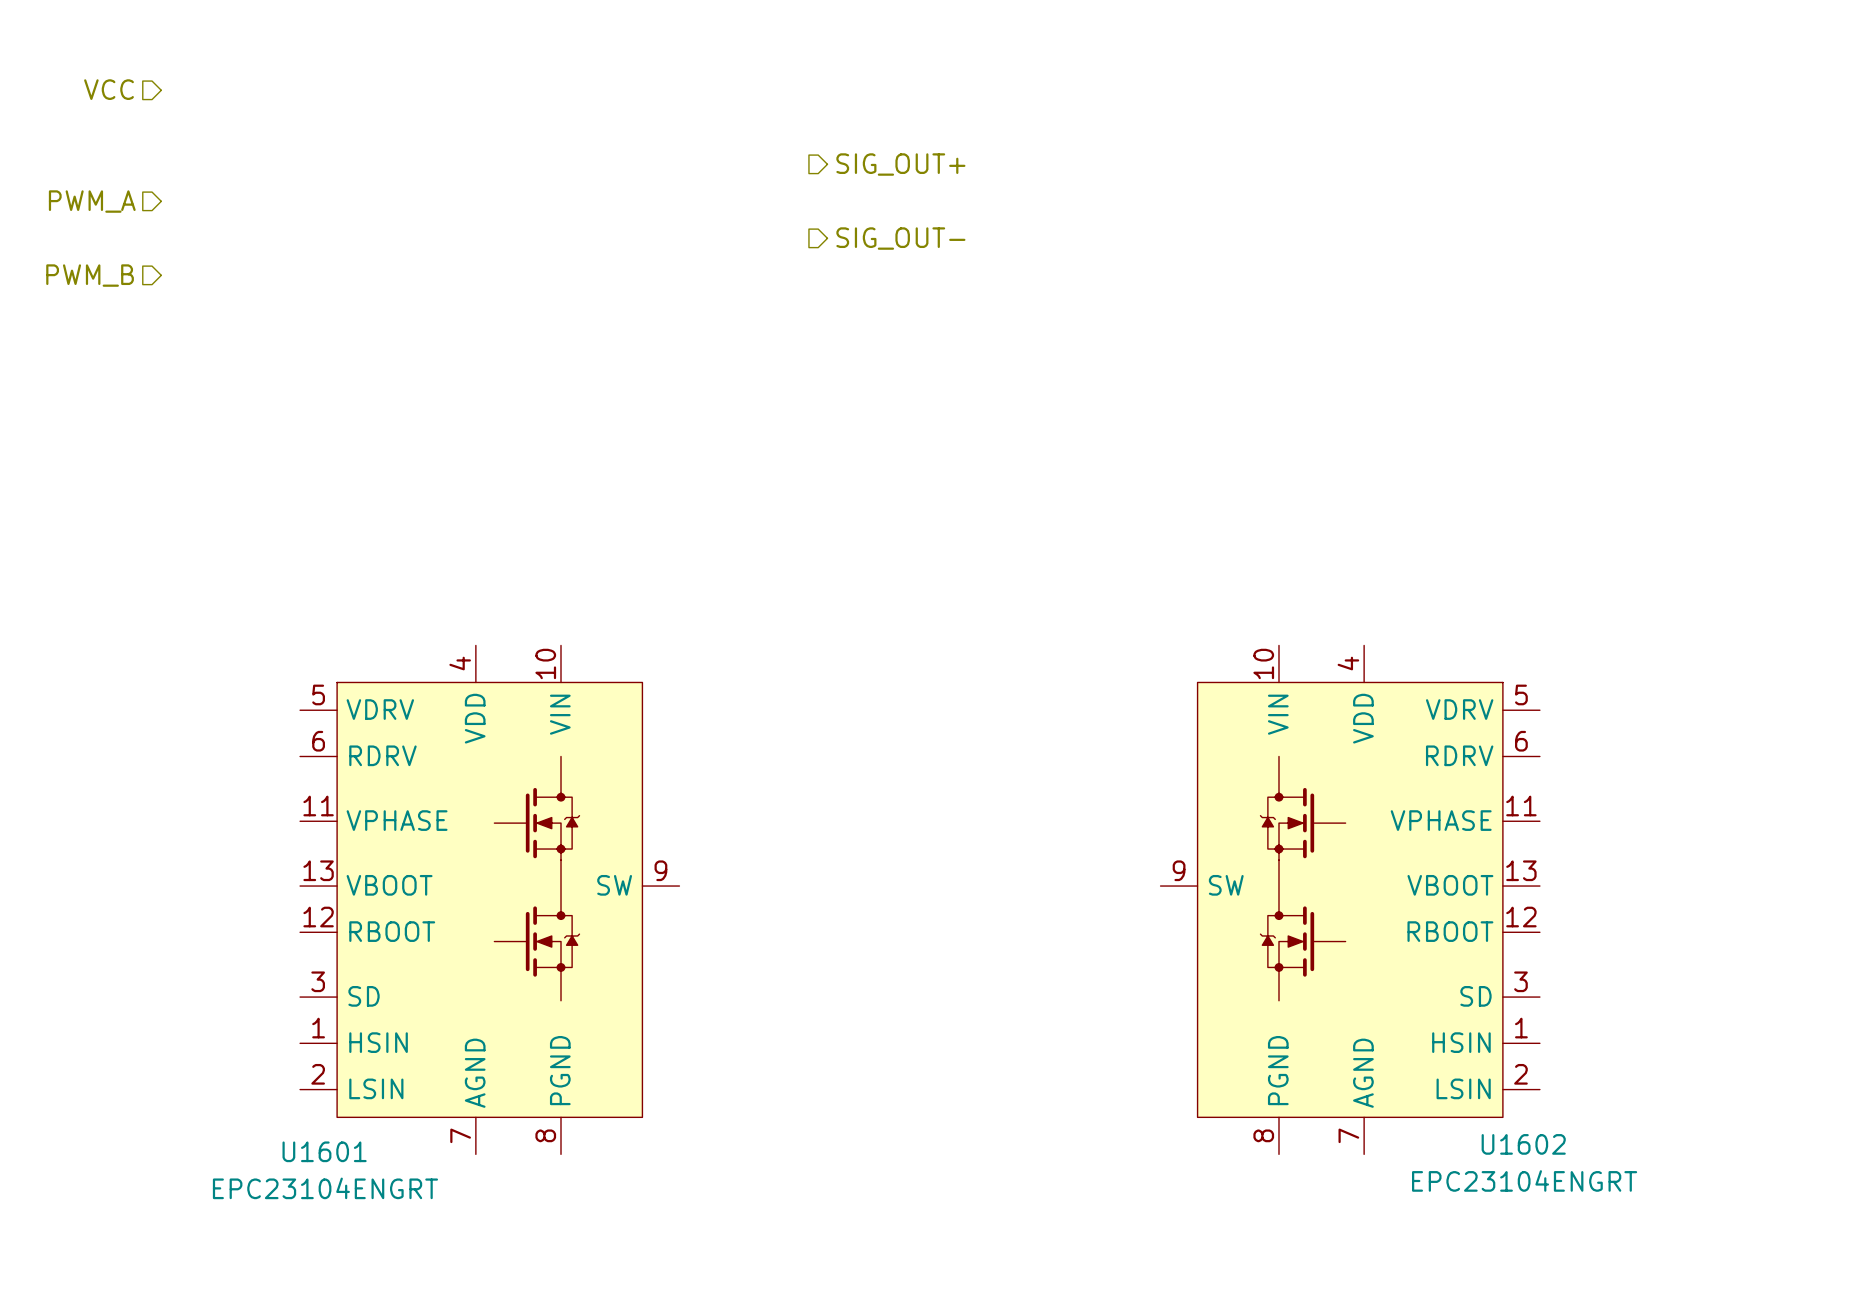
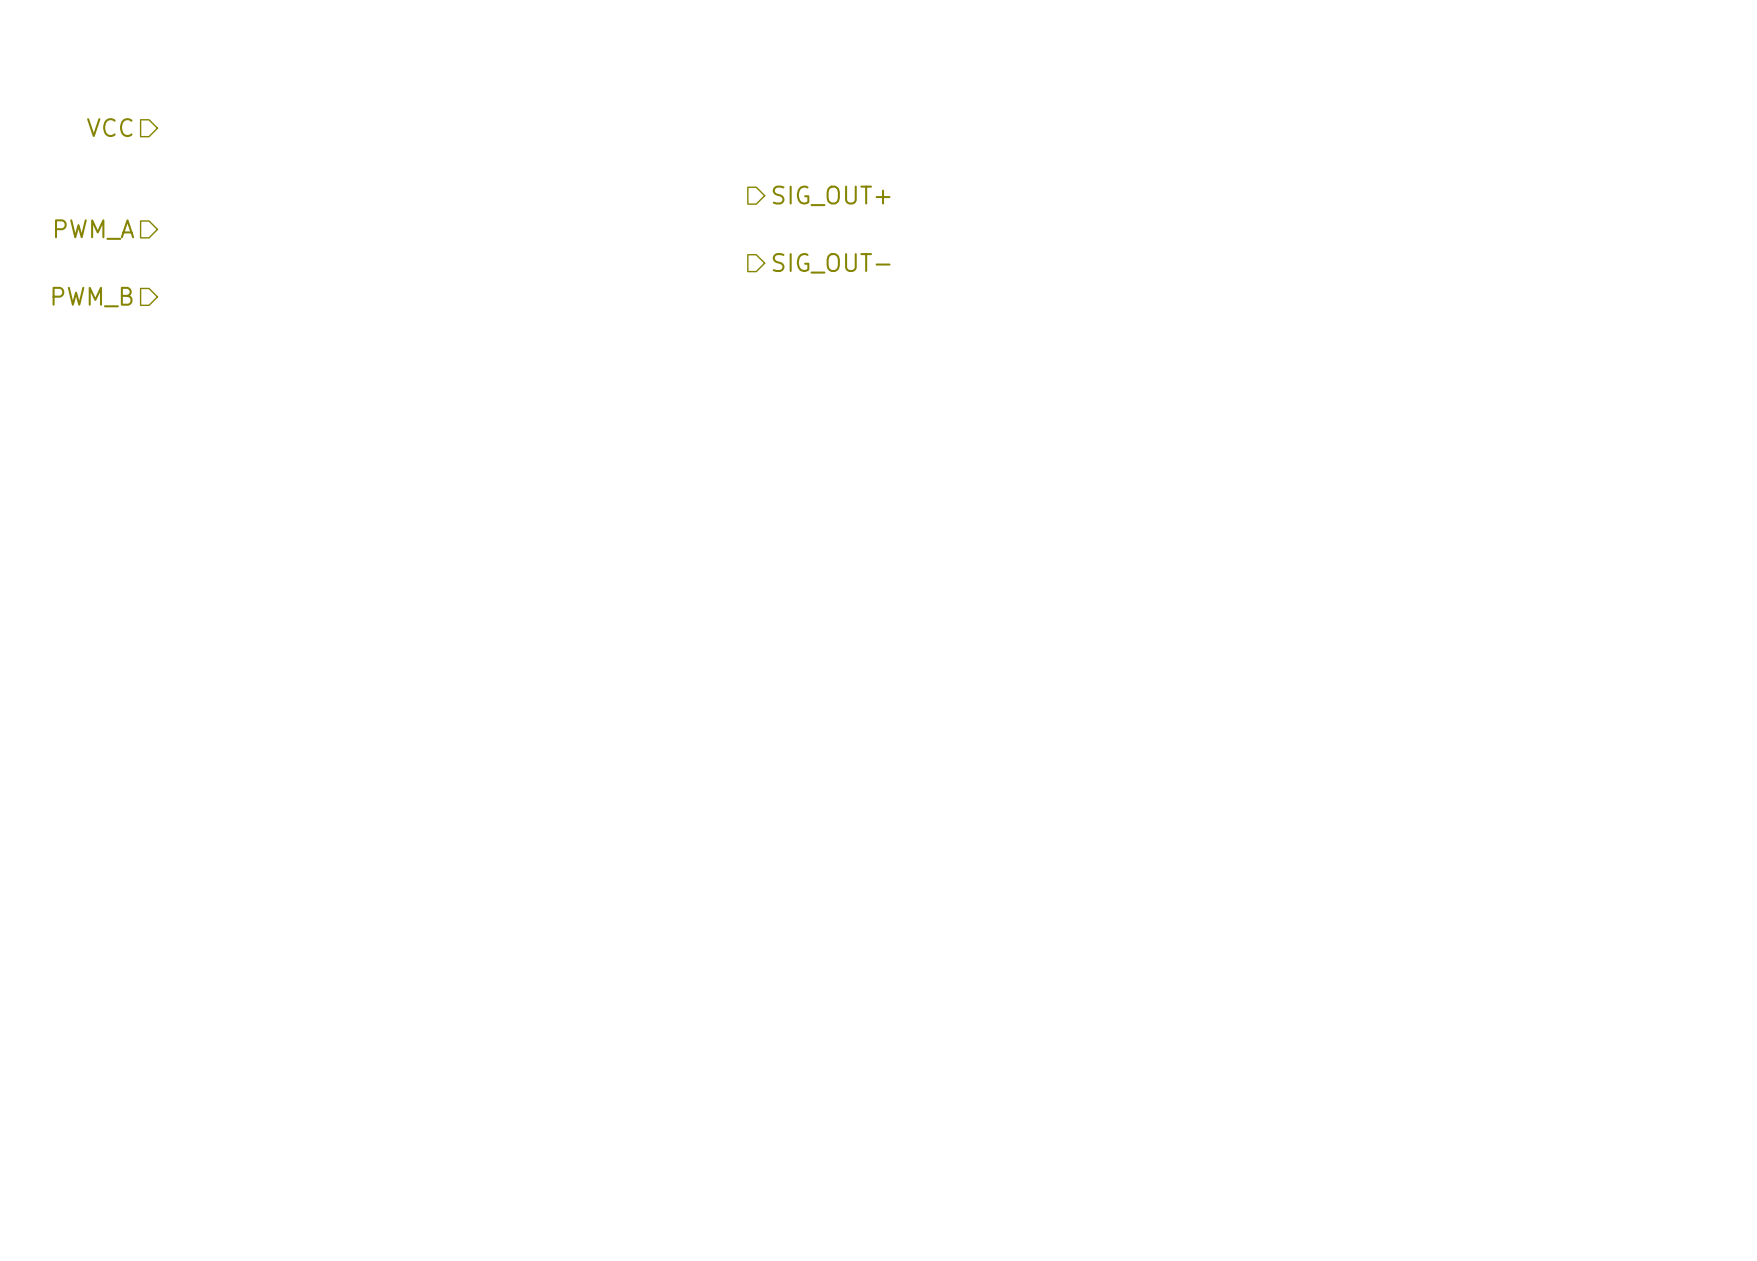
U1601: EPC23104ENGRT (489, 899) -> none
U1602: EPC23104ENGRT (1350, 899) -> none

